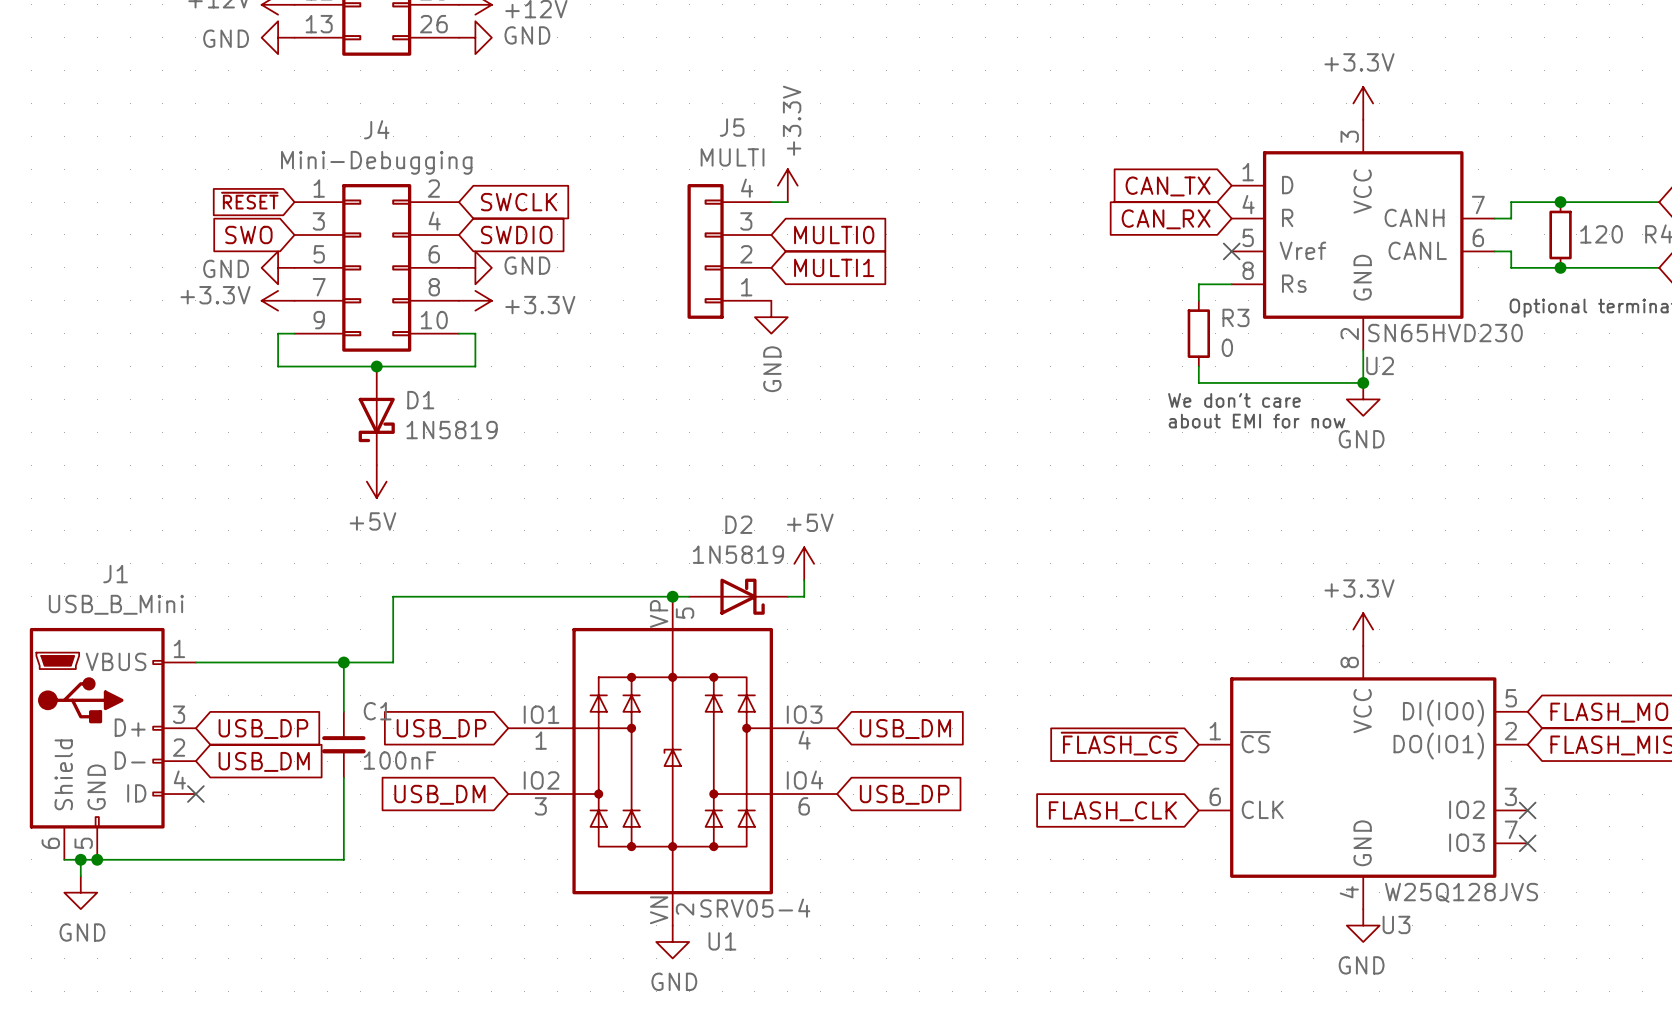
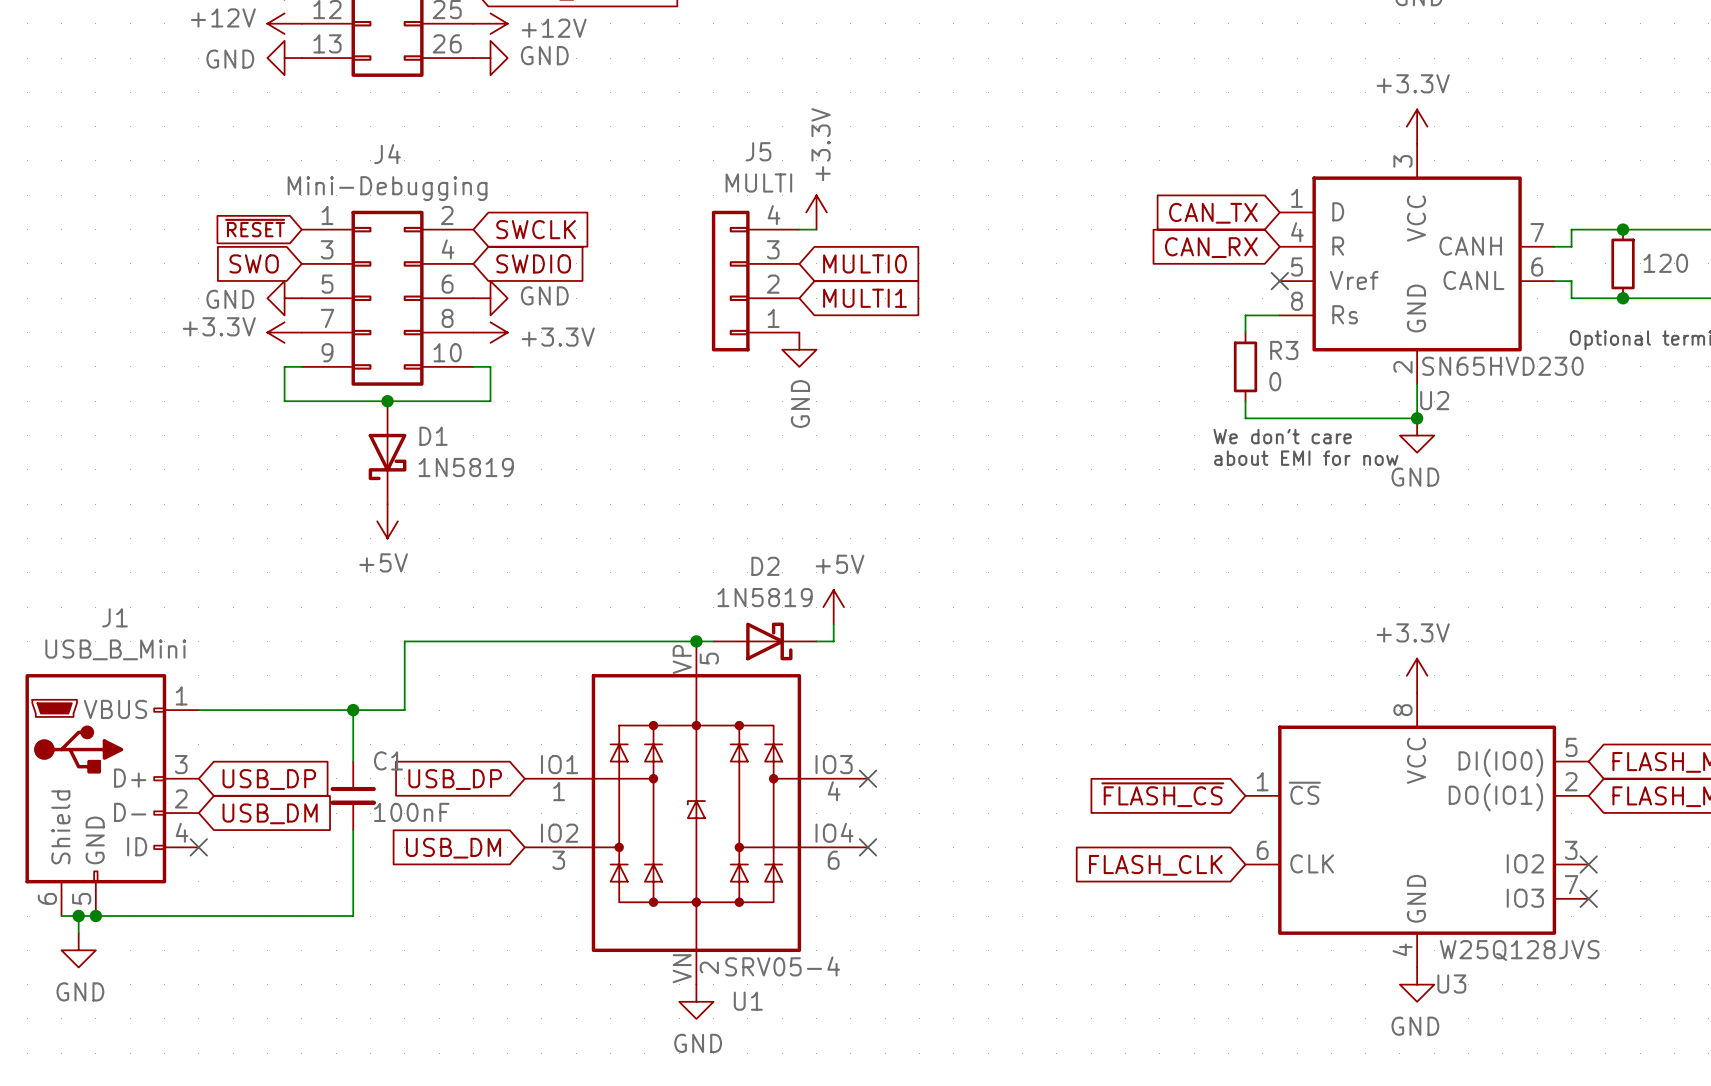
no-connect mark: none -> (868, 778)
global label: USB_DM (905, 729) -> none
no-connect mark: none -> (868, 847)
global label: USB_DP (904, 794) -> none

